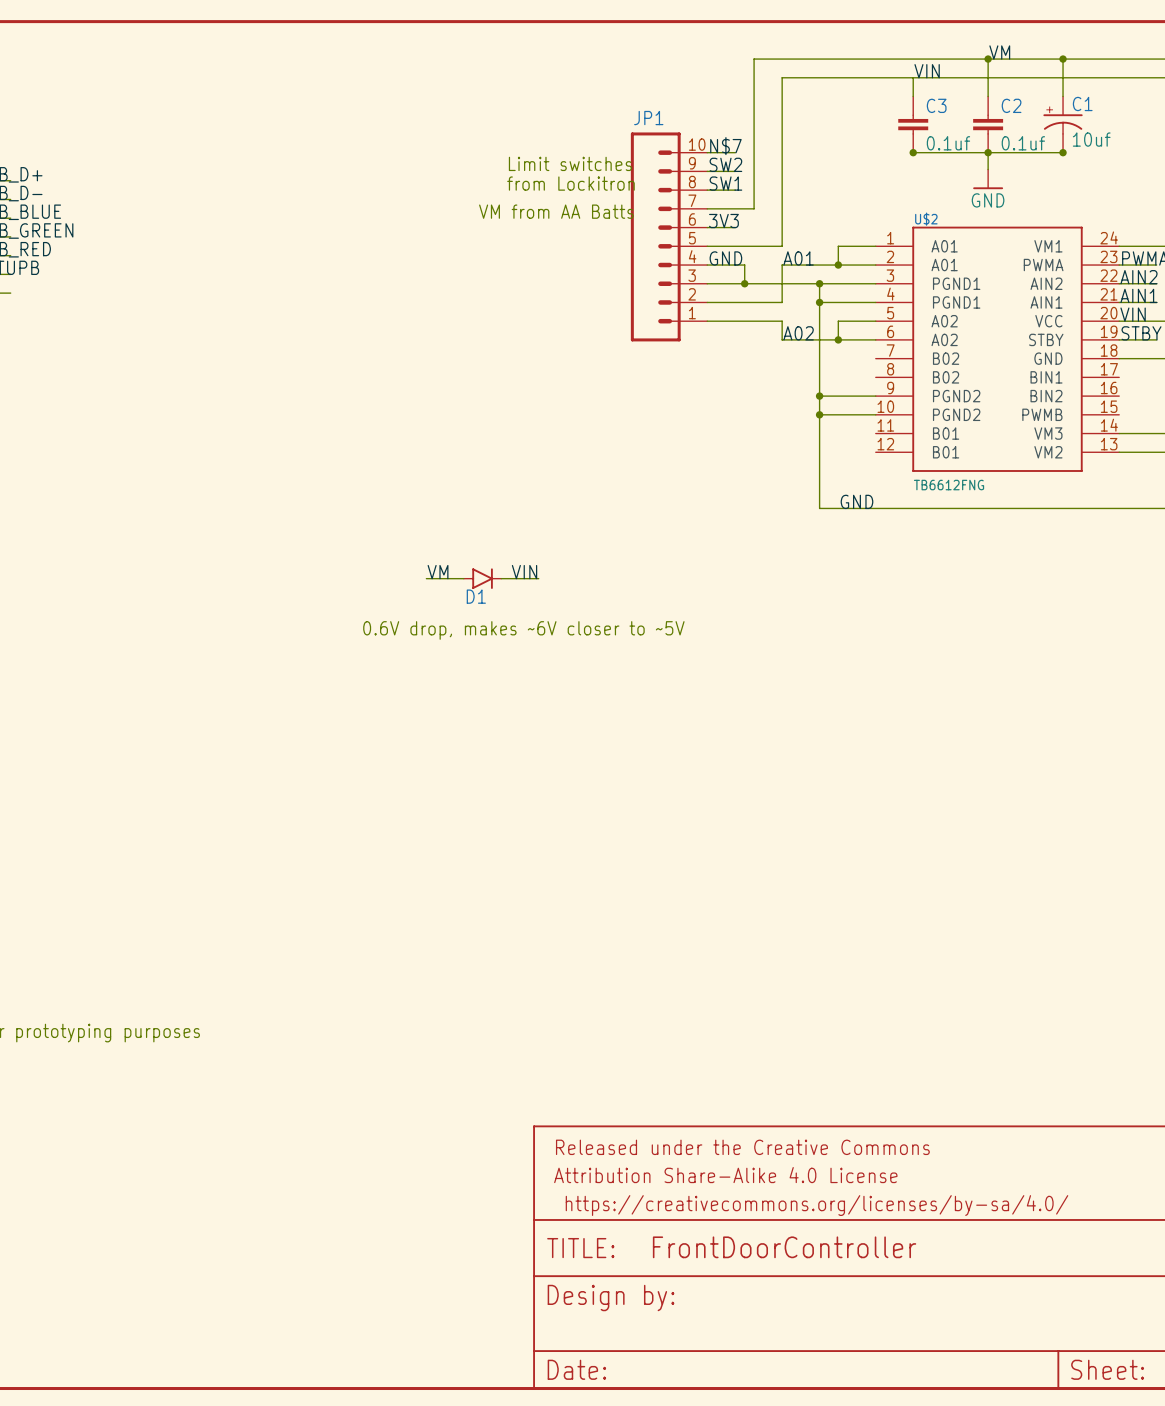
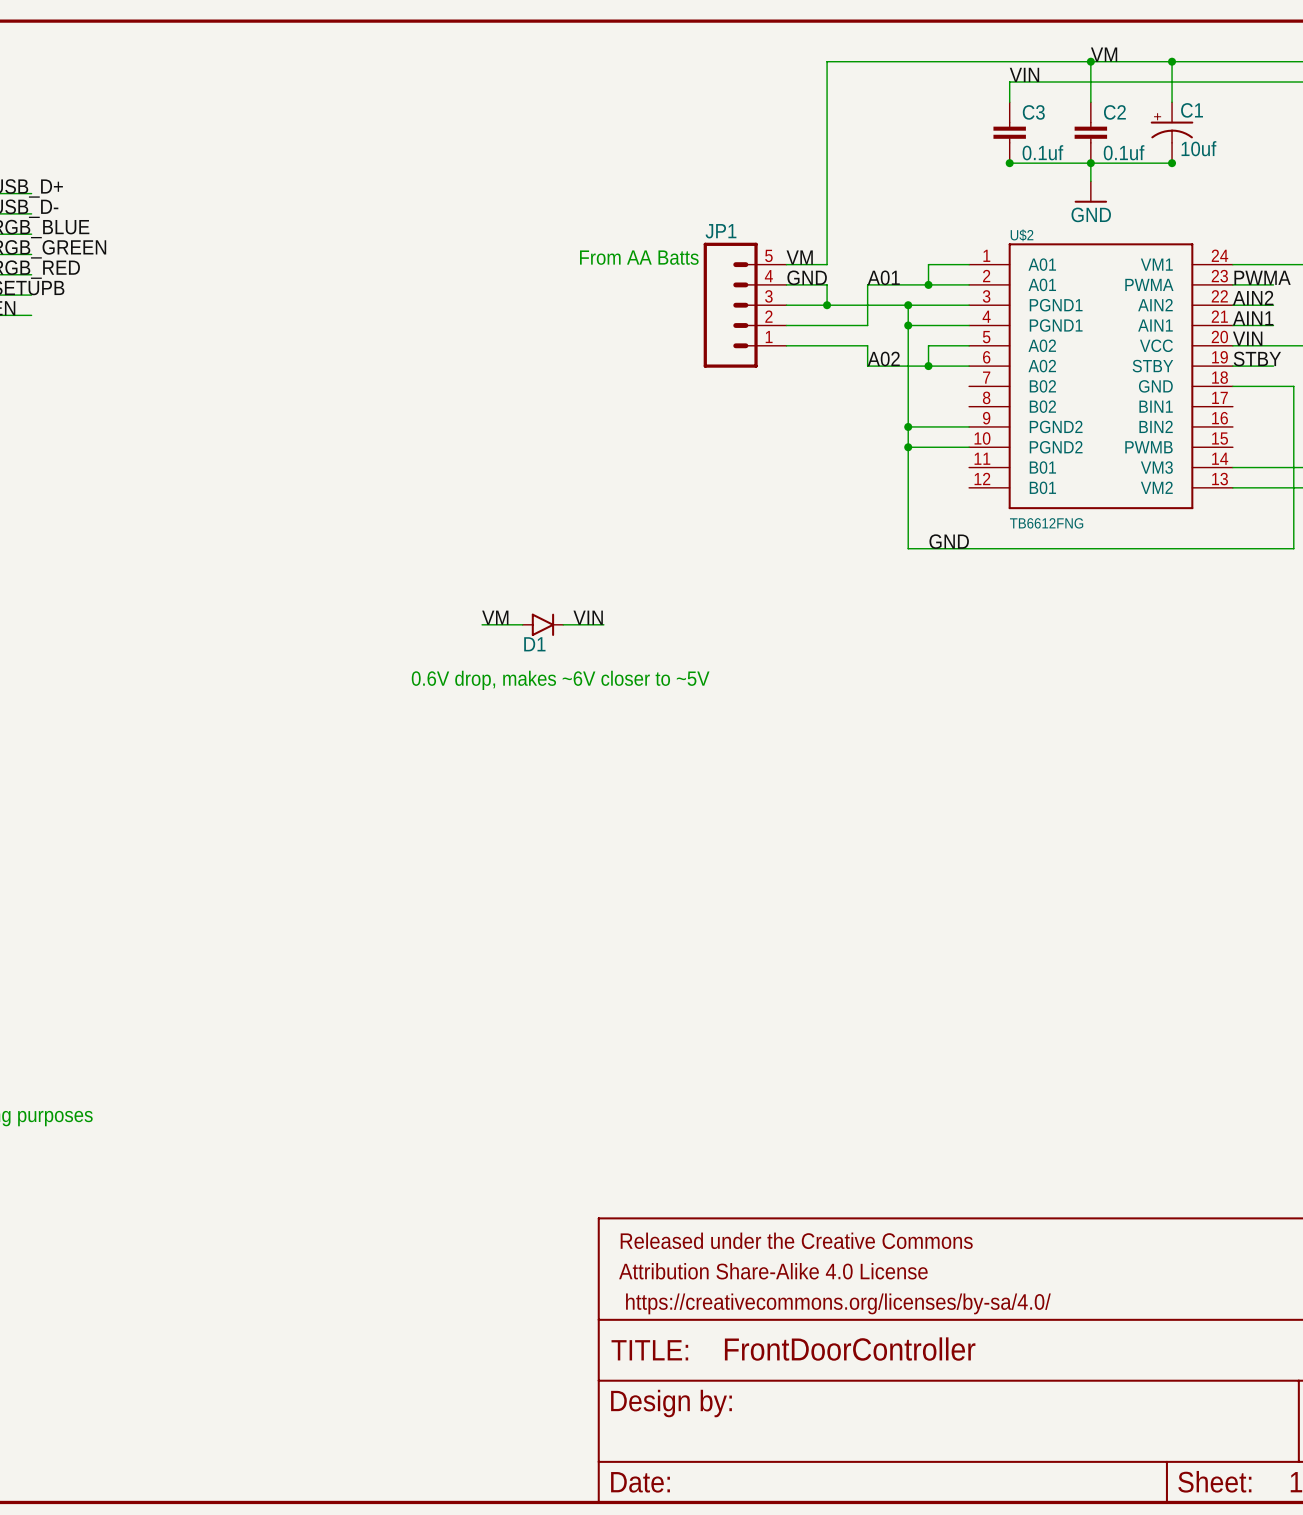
wire: (754, 59) (754, 208) (707, 208) -> (837, 61) (827, 61) (827, 264)
wire: (913, 77) (782, 77) (782, 246) (744, 246) -> none
JP1 name position: JP1 (648, 118) -> JP1 (721, 231)
JP1 symbol: [630, 132, 708, 342] -> [703, 242, 787, 368]
label: N$7 (725, 146) -> none
wire: (707, 152) (735, 152) -> none
text: Limit switches (570, 163) -> none
label: SW2 (725, 164) -> none
wire: (707, 171) (735, 171) -> none
text: from Lockitron (570, 183) -> none
label: SW1 (725, 183) -> none
wire: (707, 190) (735, 190) -> none
text: VM from AA Batts (556, 211) -> none
label: 3V3 (723, 221) -> none
wire: (707, 227) (735, 227) -> none
text: none -> From AA Batts (639, 257)
label: none -> VM (799, 257)

